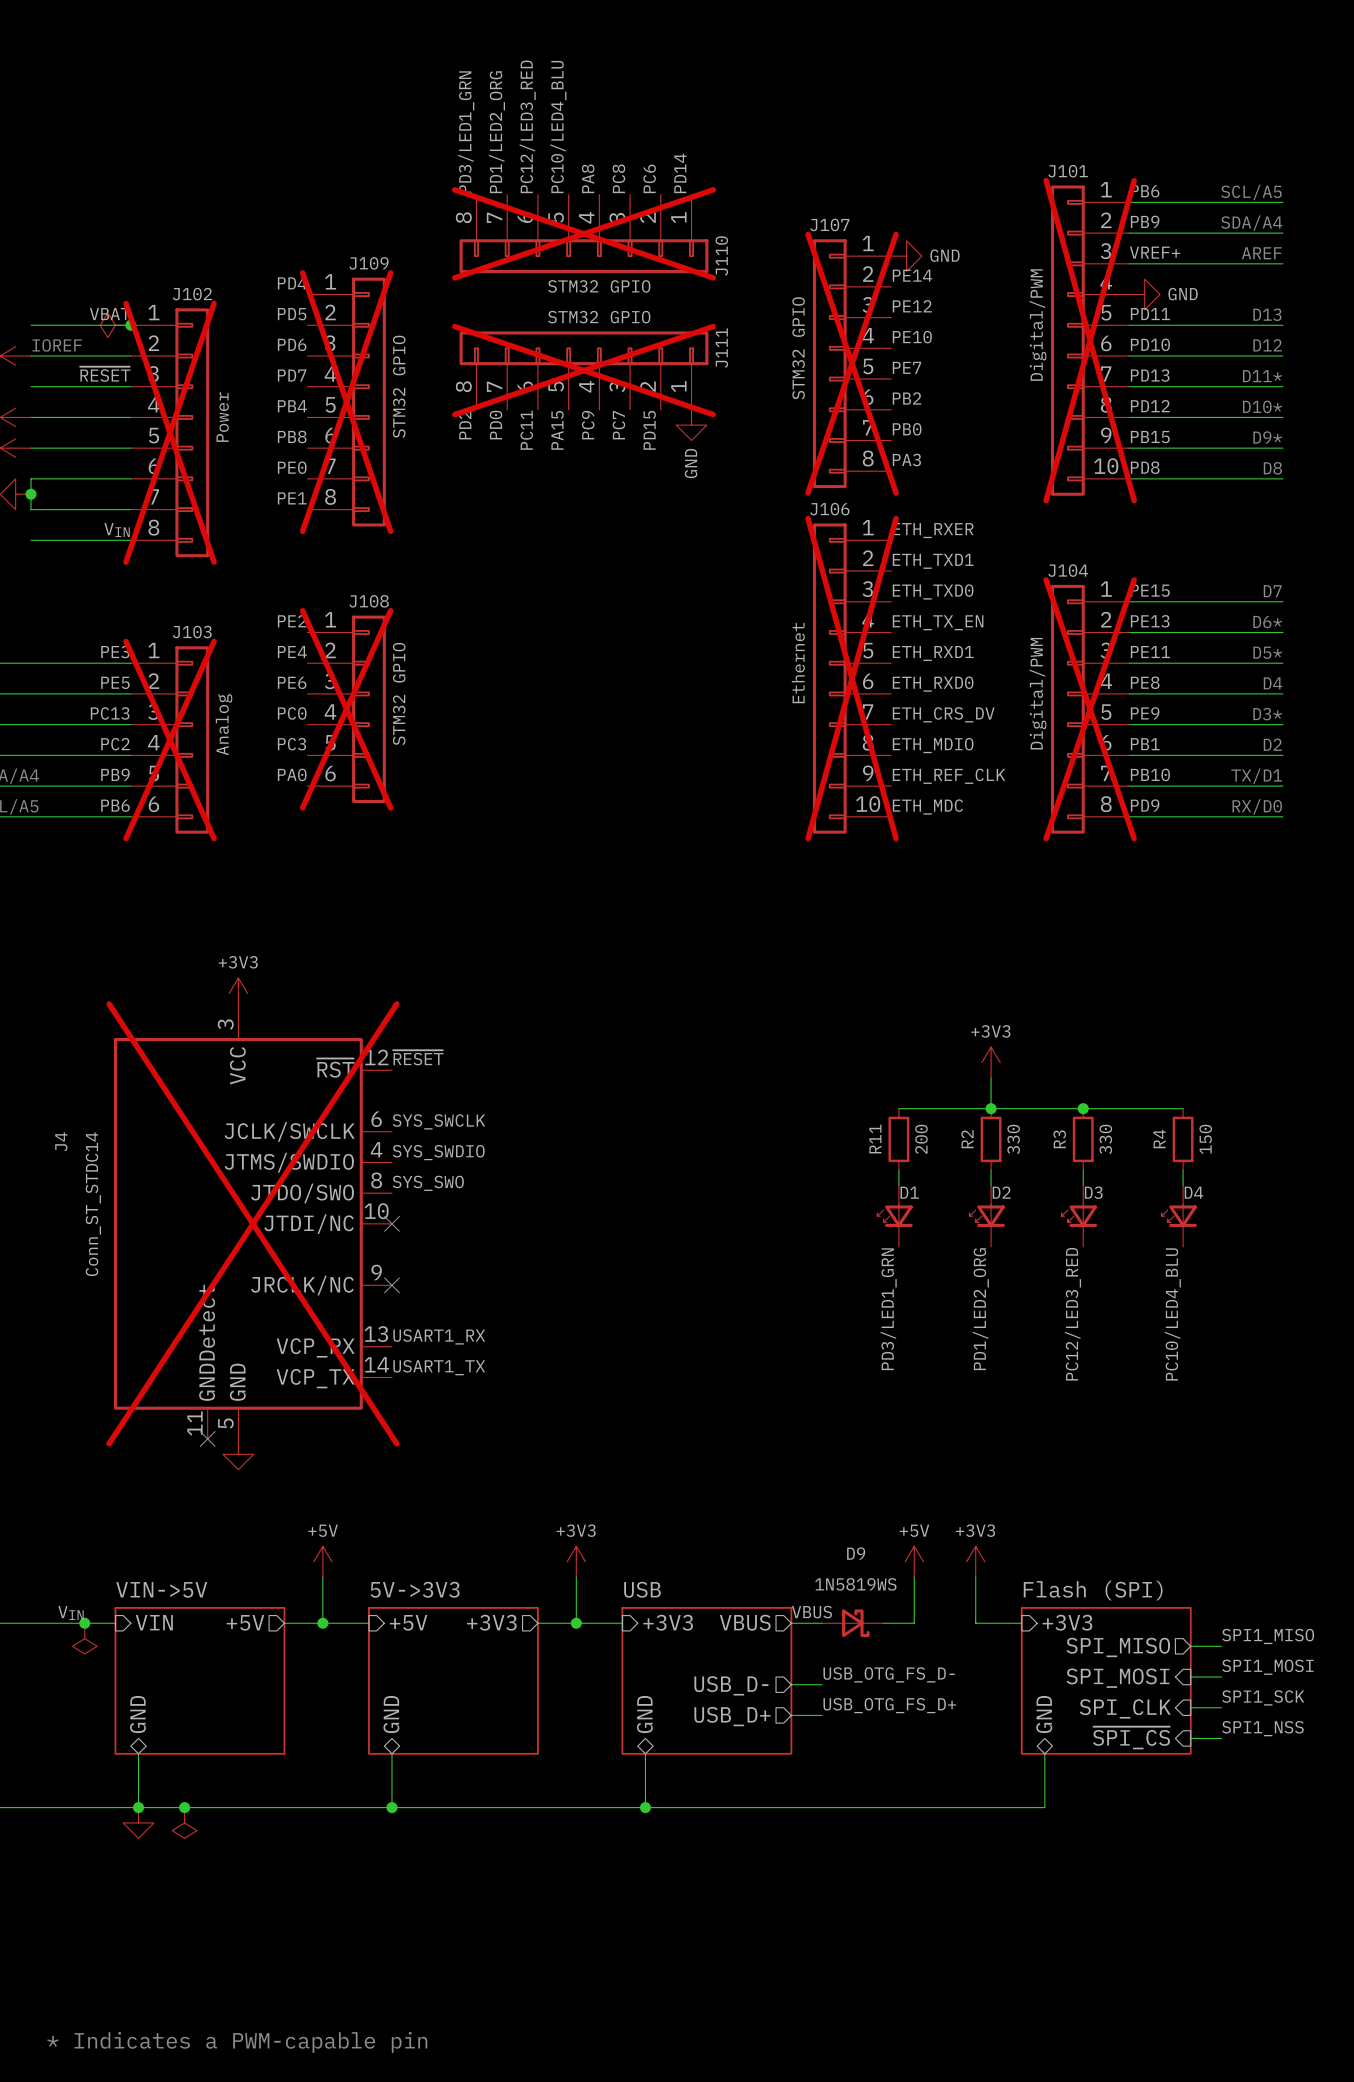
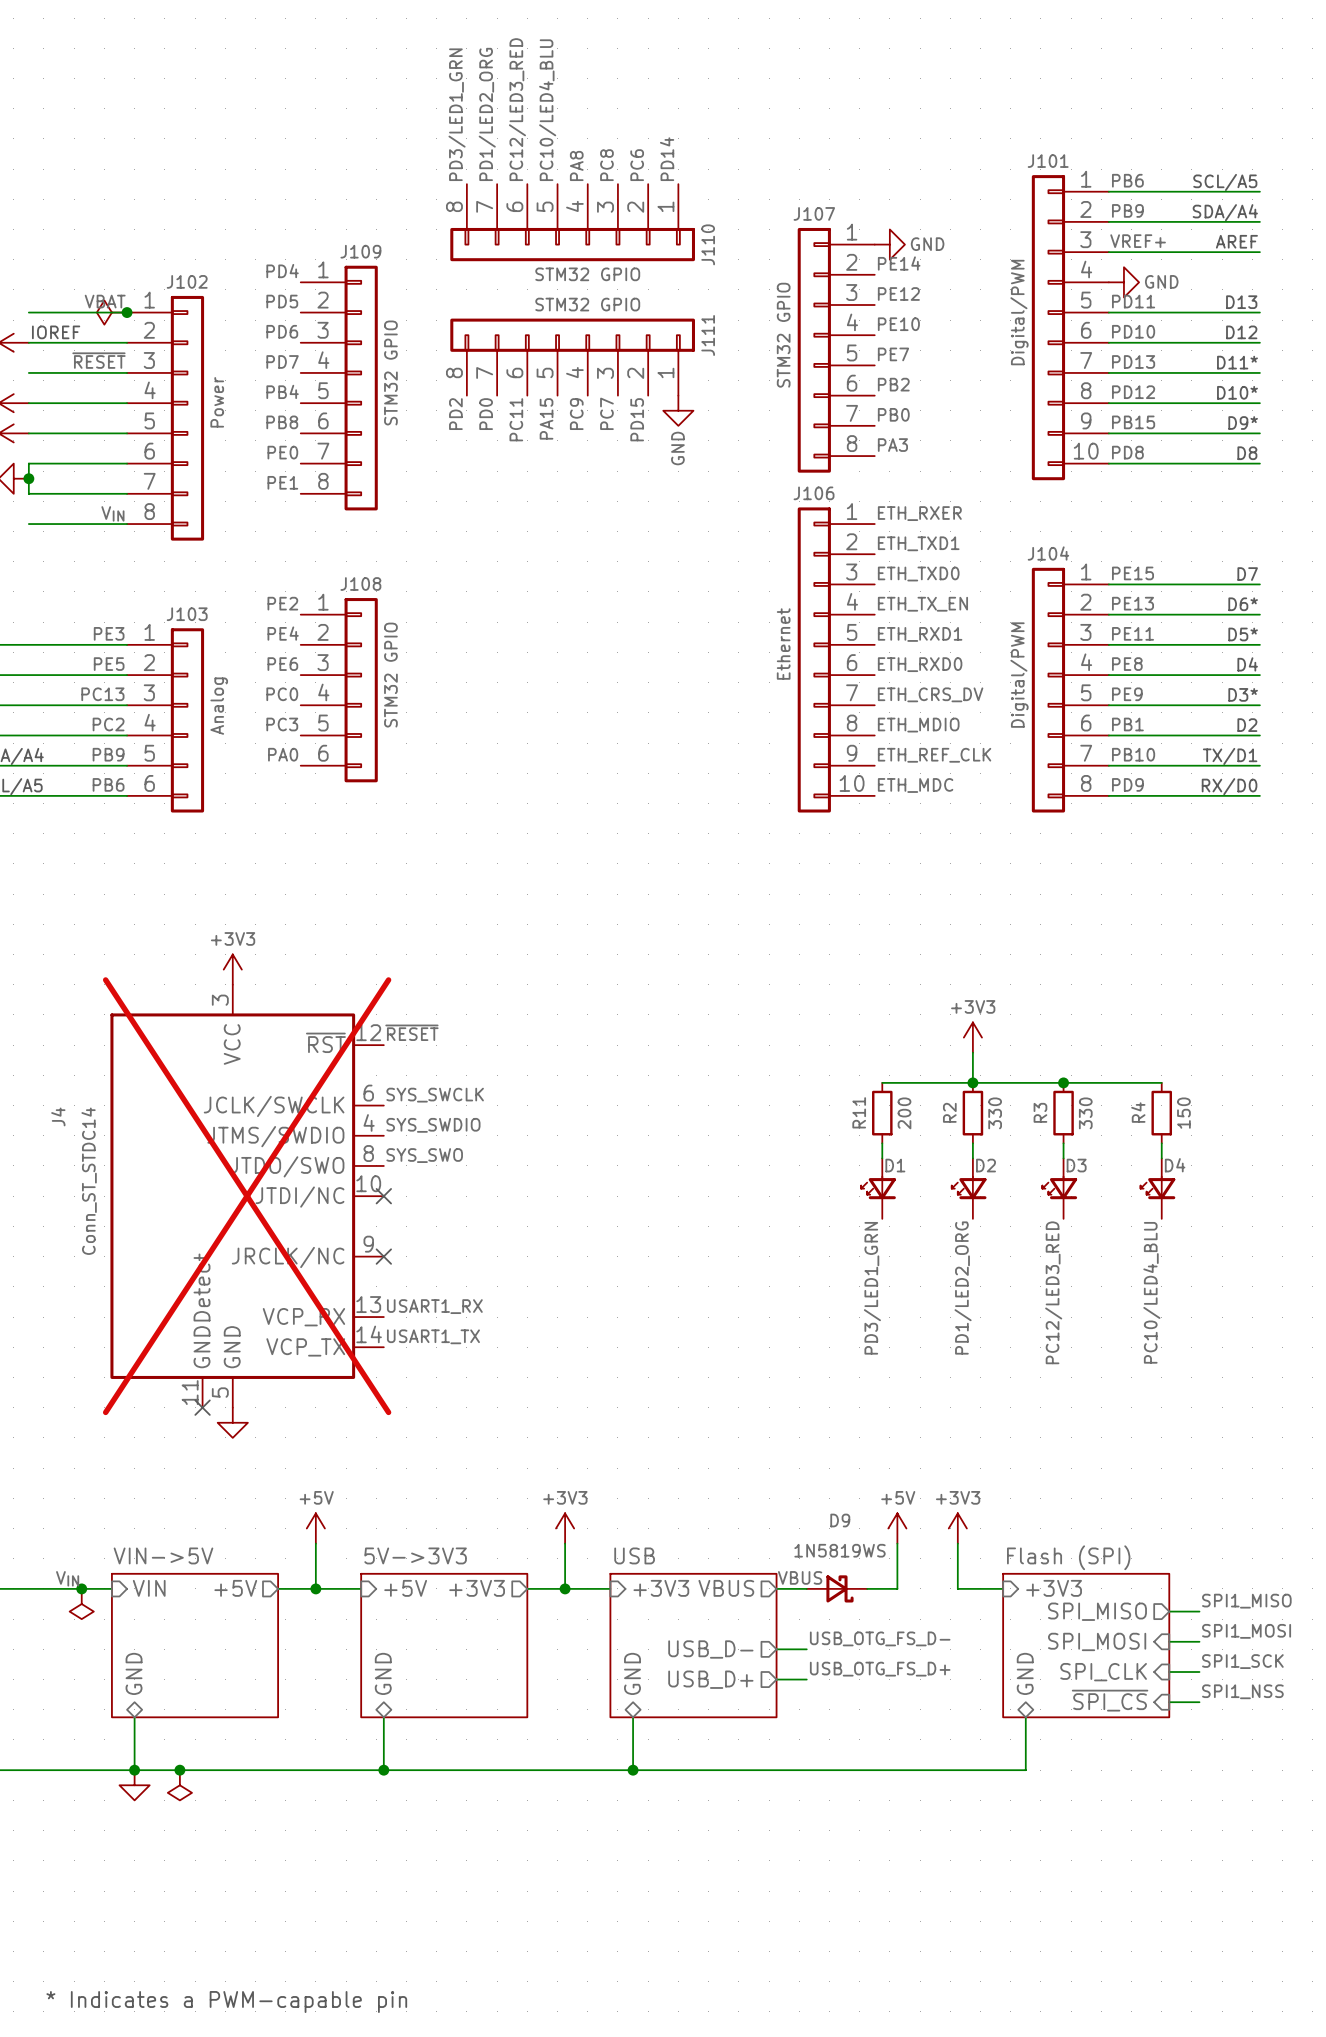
J110 do-not-place cross: (584, 233) -> none
J101 do-not-place cross: (1090, 340) -> none
J107 do-not-place cross: (852, 363) -> none
J111 do-not-place cross: (584, 370) -> none
J109 do-not-place cross: (346, 402) -> none
J102 do-not-place cross: (170, 432) -> none
J106 do-not-place cross: (852, 678) -> none
J108 do-not-place cross: (346, 709) -> none
J104 do-not-place cross: (1090, 709) -> none
J103 do-not-place cross: (170, 740) -> none

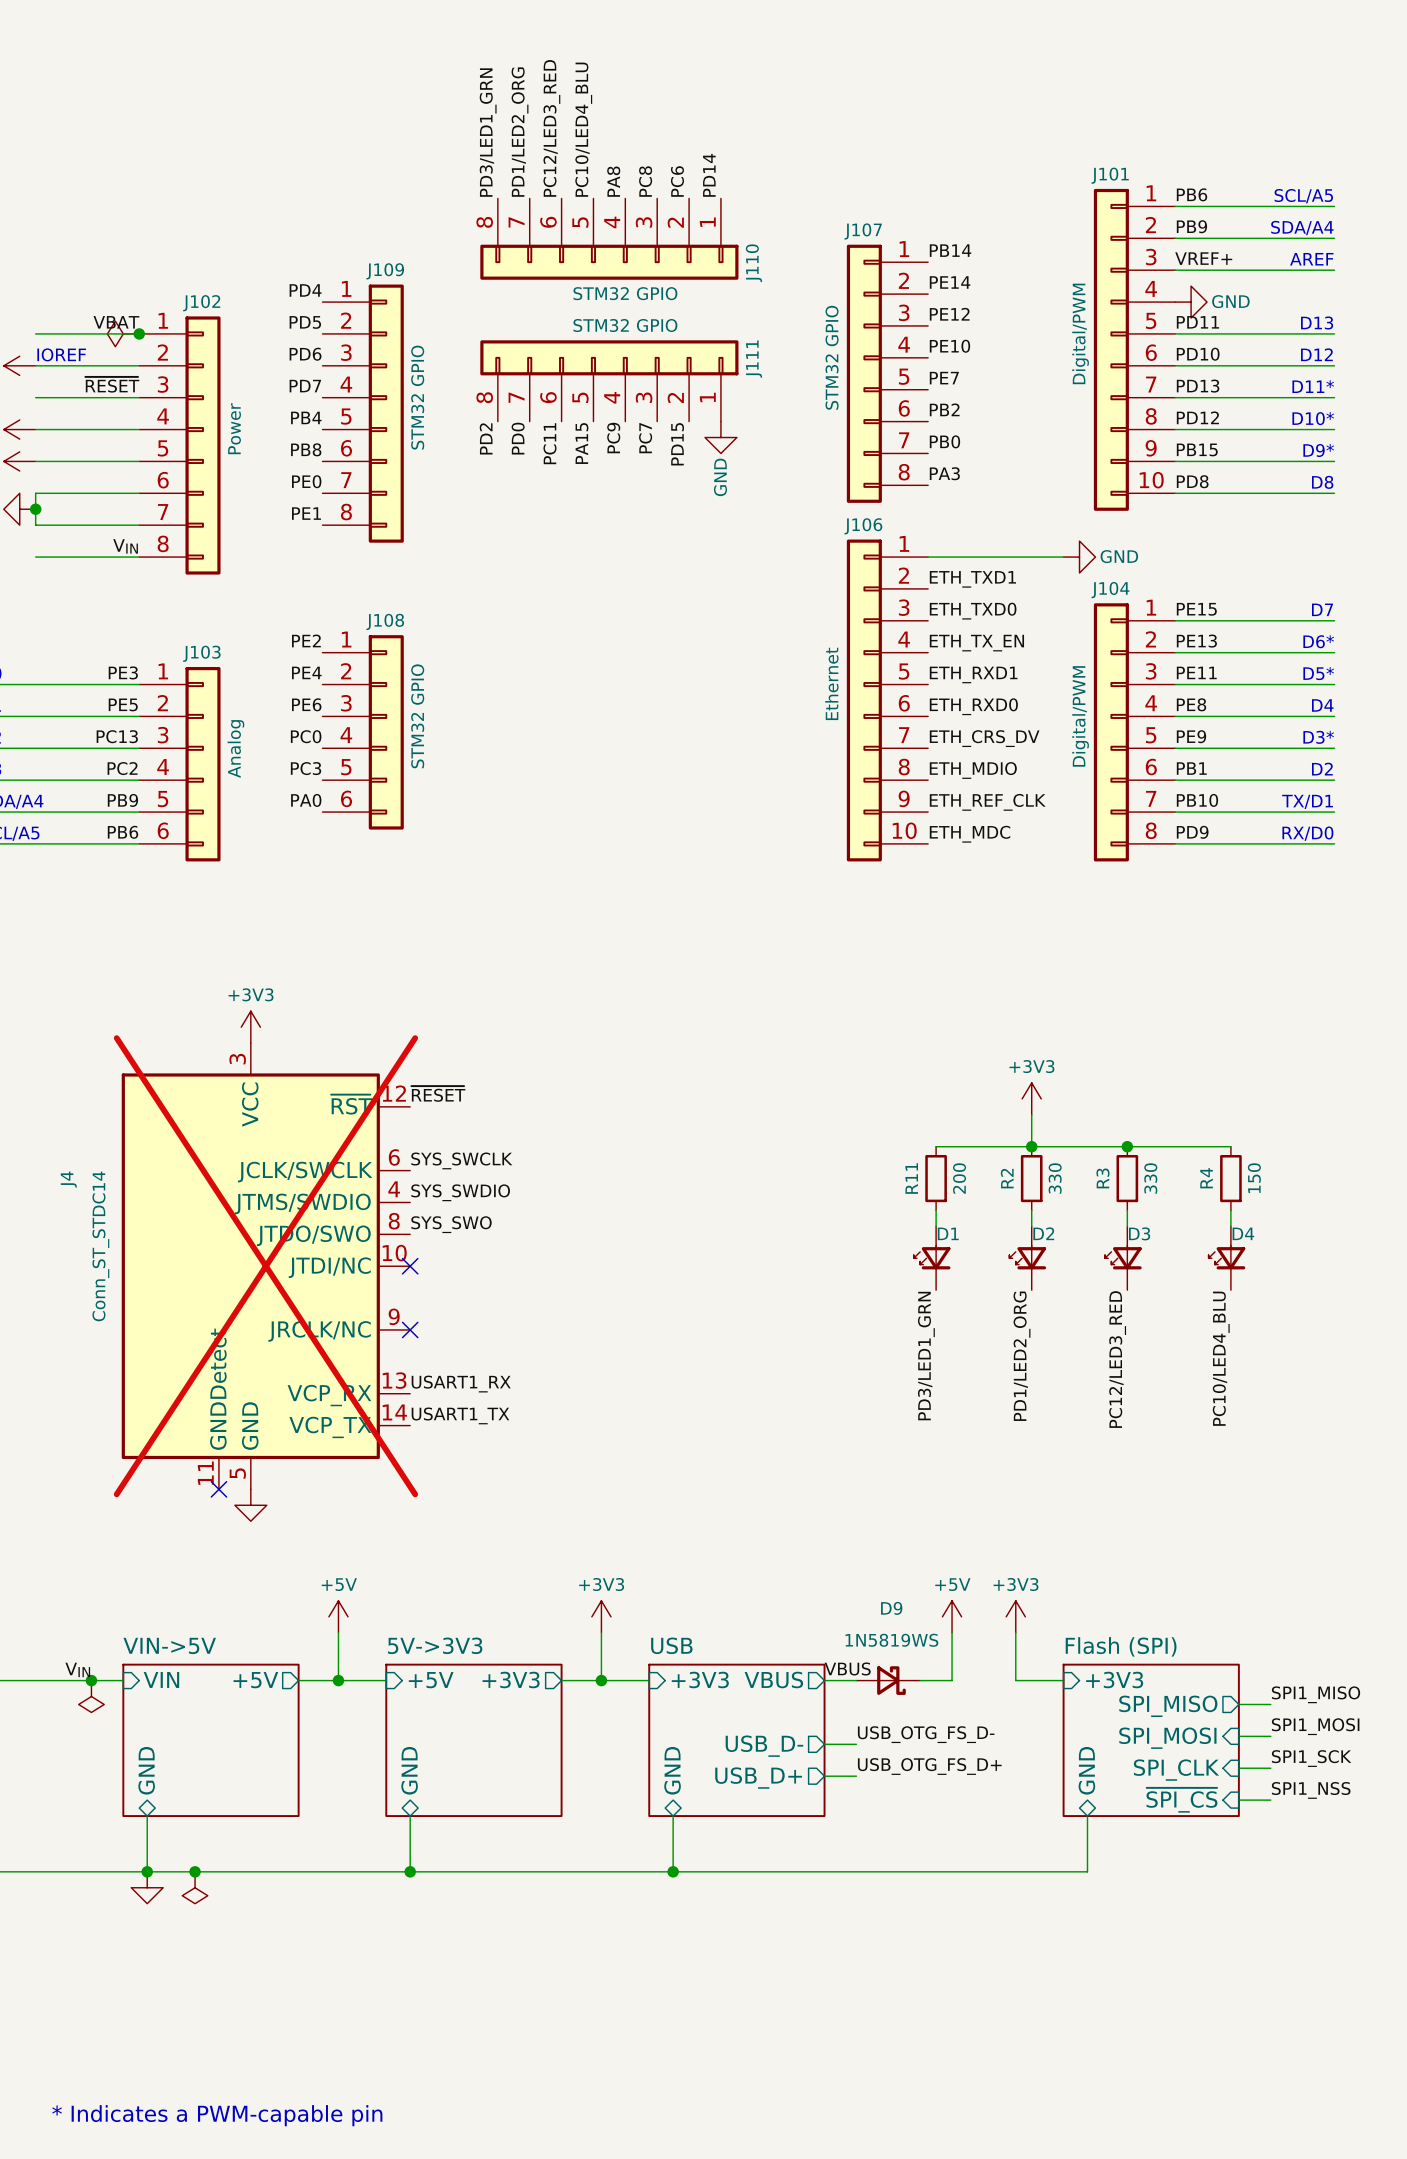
label: none -> PB14 (950, 250)
power symbol: GND (889, 244) -> none
label: ETH_RXER (919, 513) -> none
wire: none -> (928, 557) (1063, 557)
power symbol: none -> GND (1079, 557)

